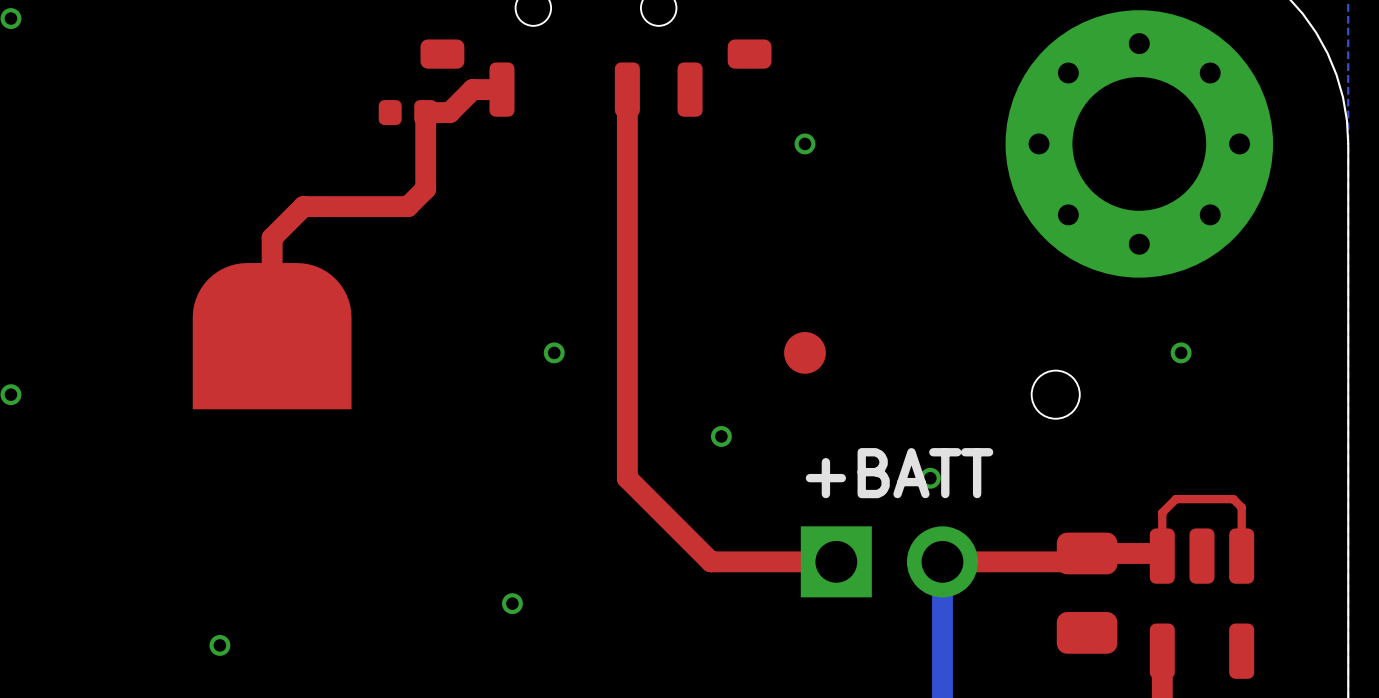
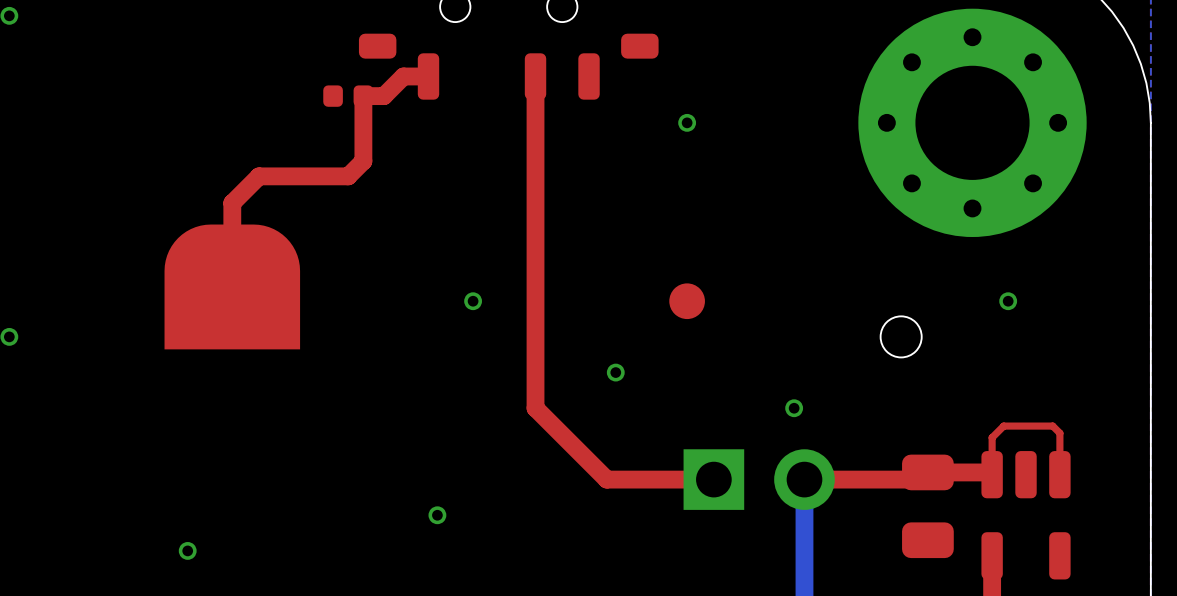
text: +BATT (899, 473) -> none

